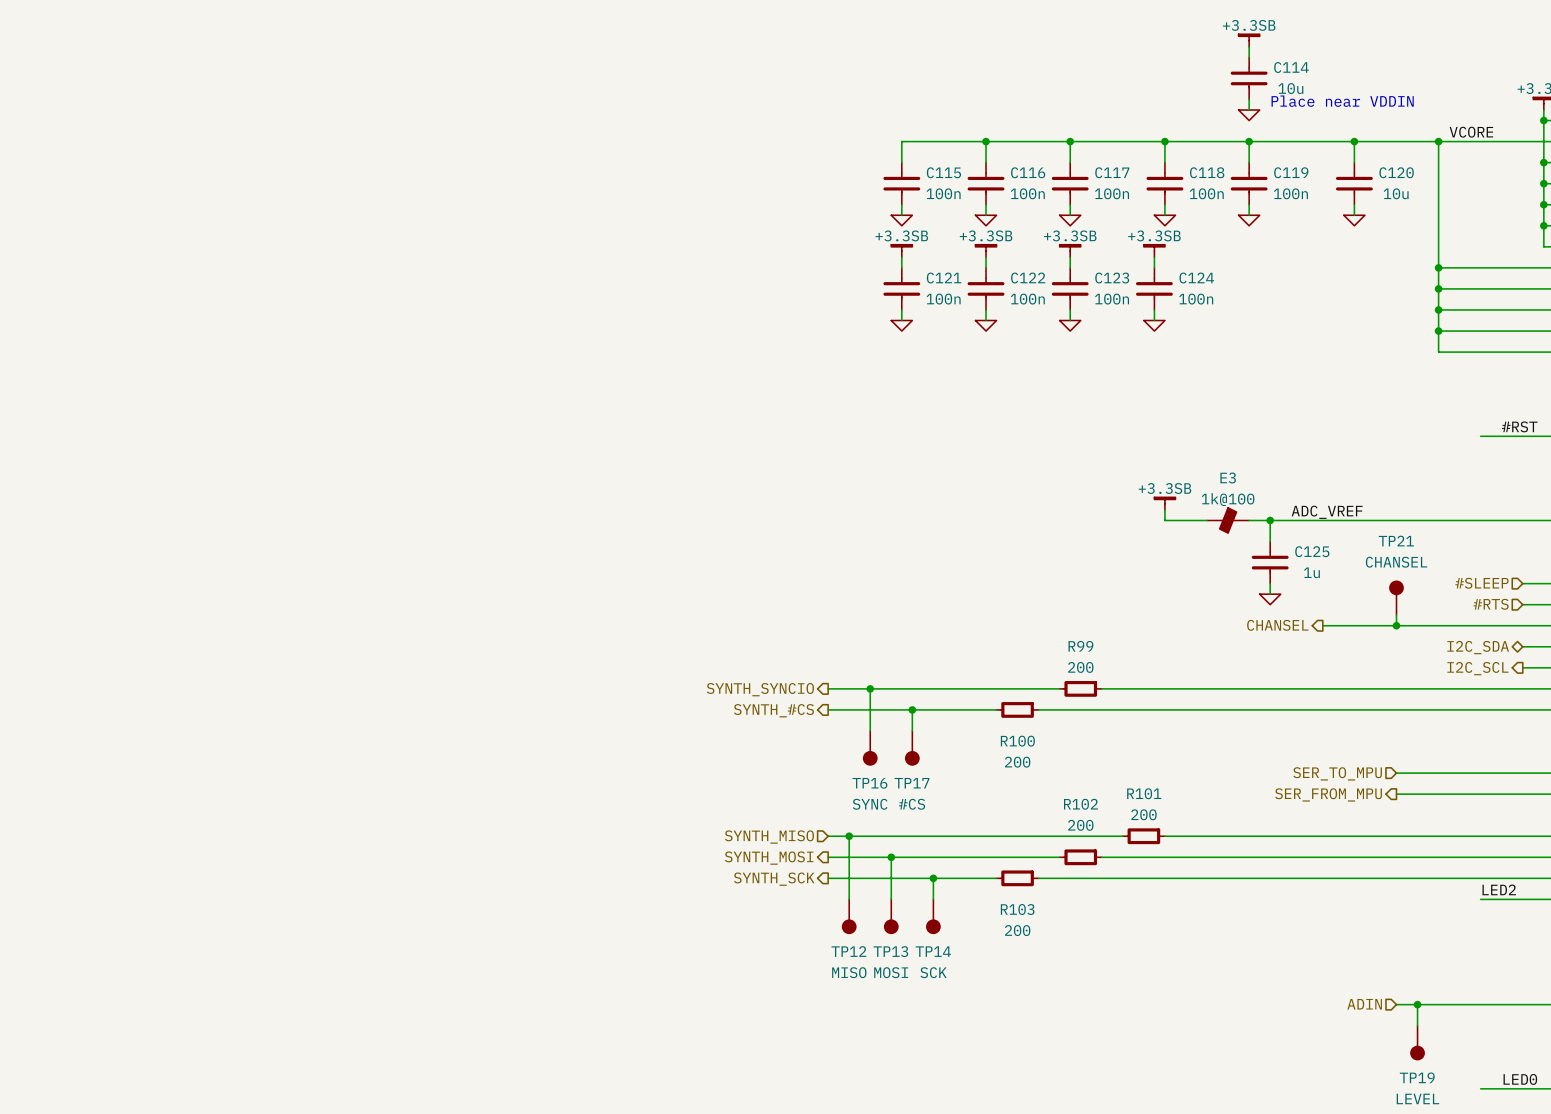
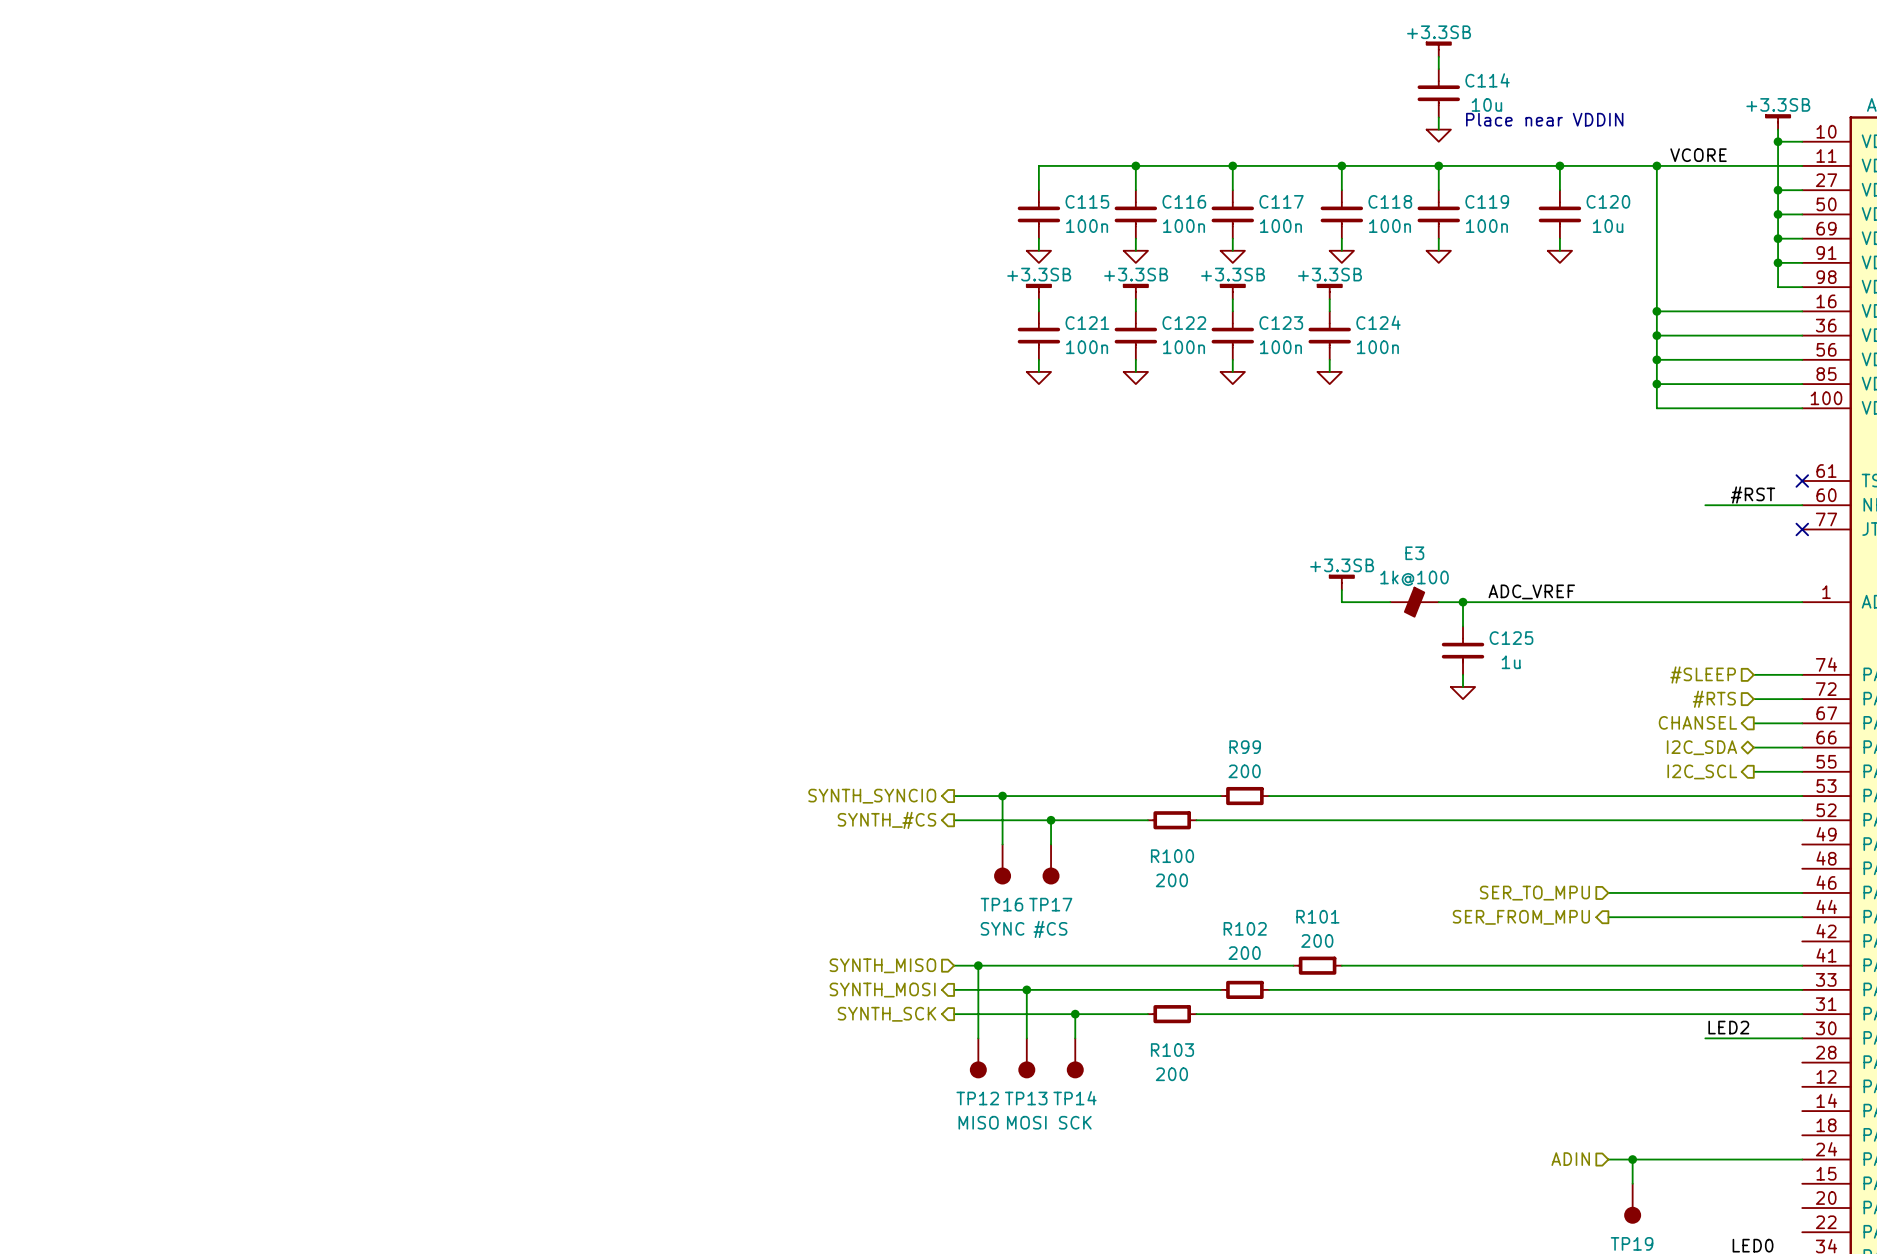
TP21: CHANSEL (1396, 597) -> none
wire: (1396, 615) (1396, 625) -> none
hierarchical label position: CHANSEL (1277, 625) -> CHANSEL (1697, 722)
wire: (1322, 625) (1522, 625) -> none
junction: (1396, 625) -> none

